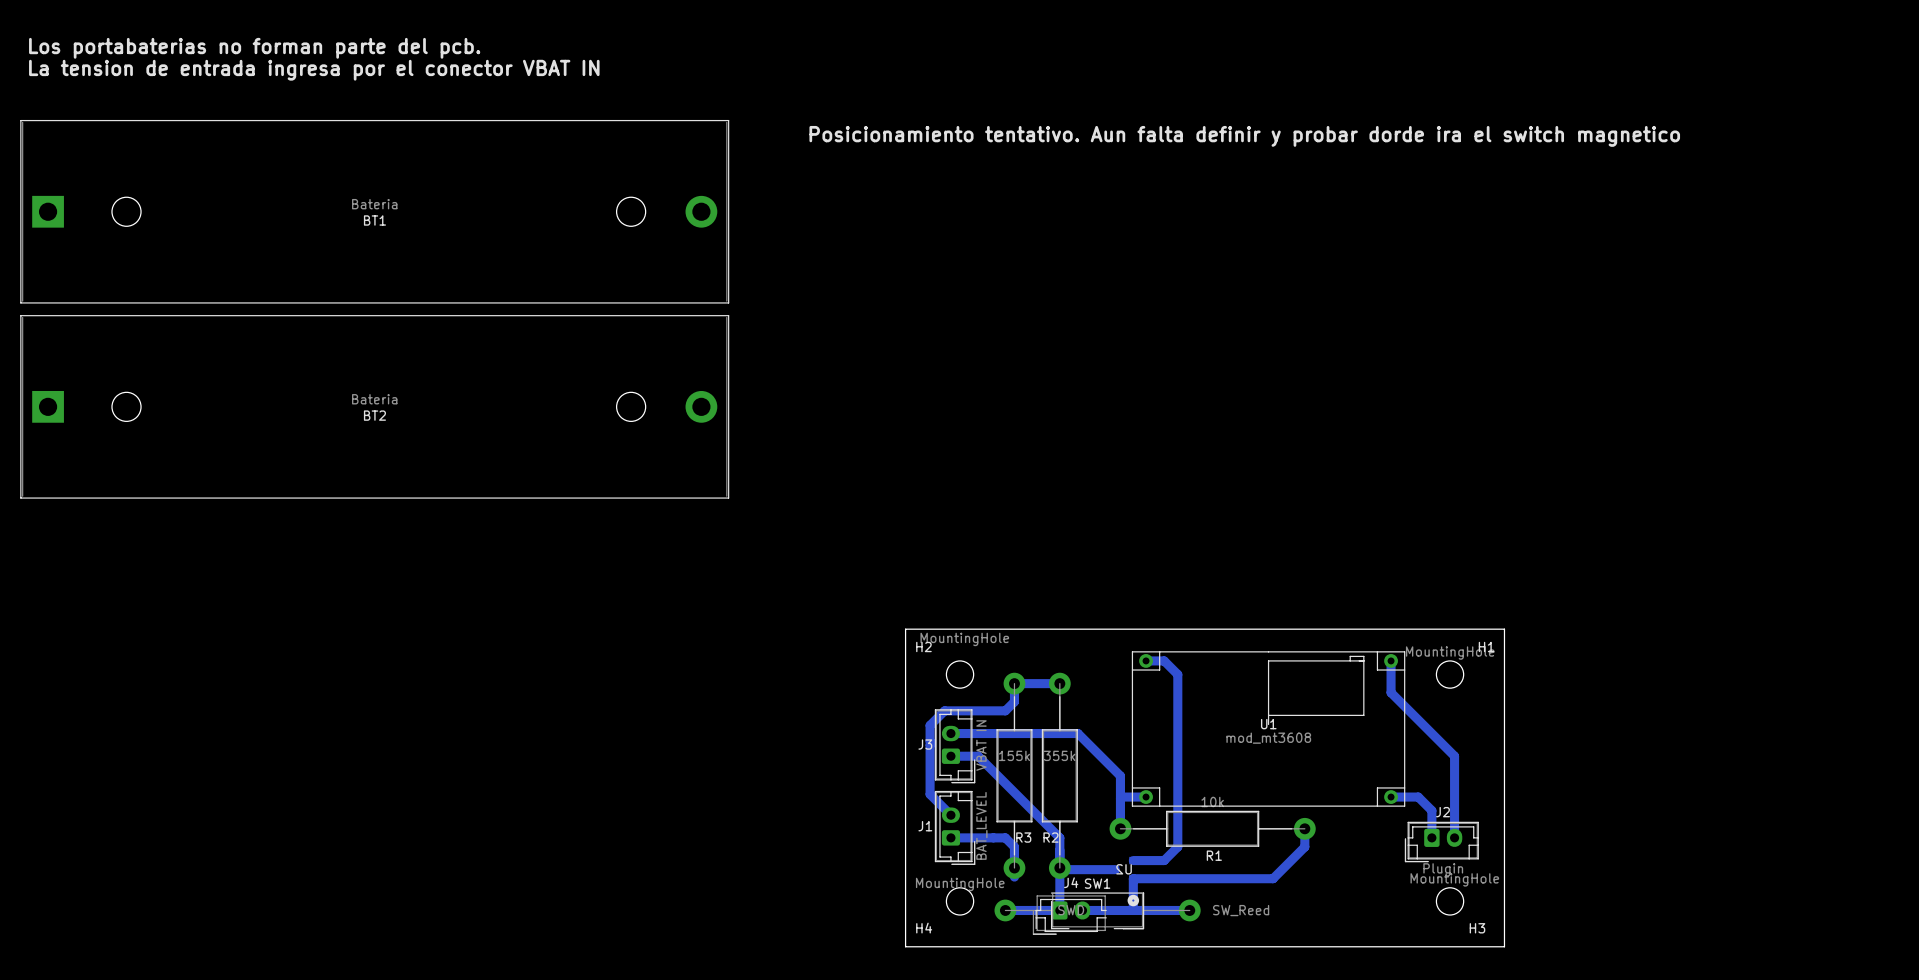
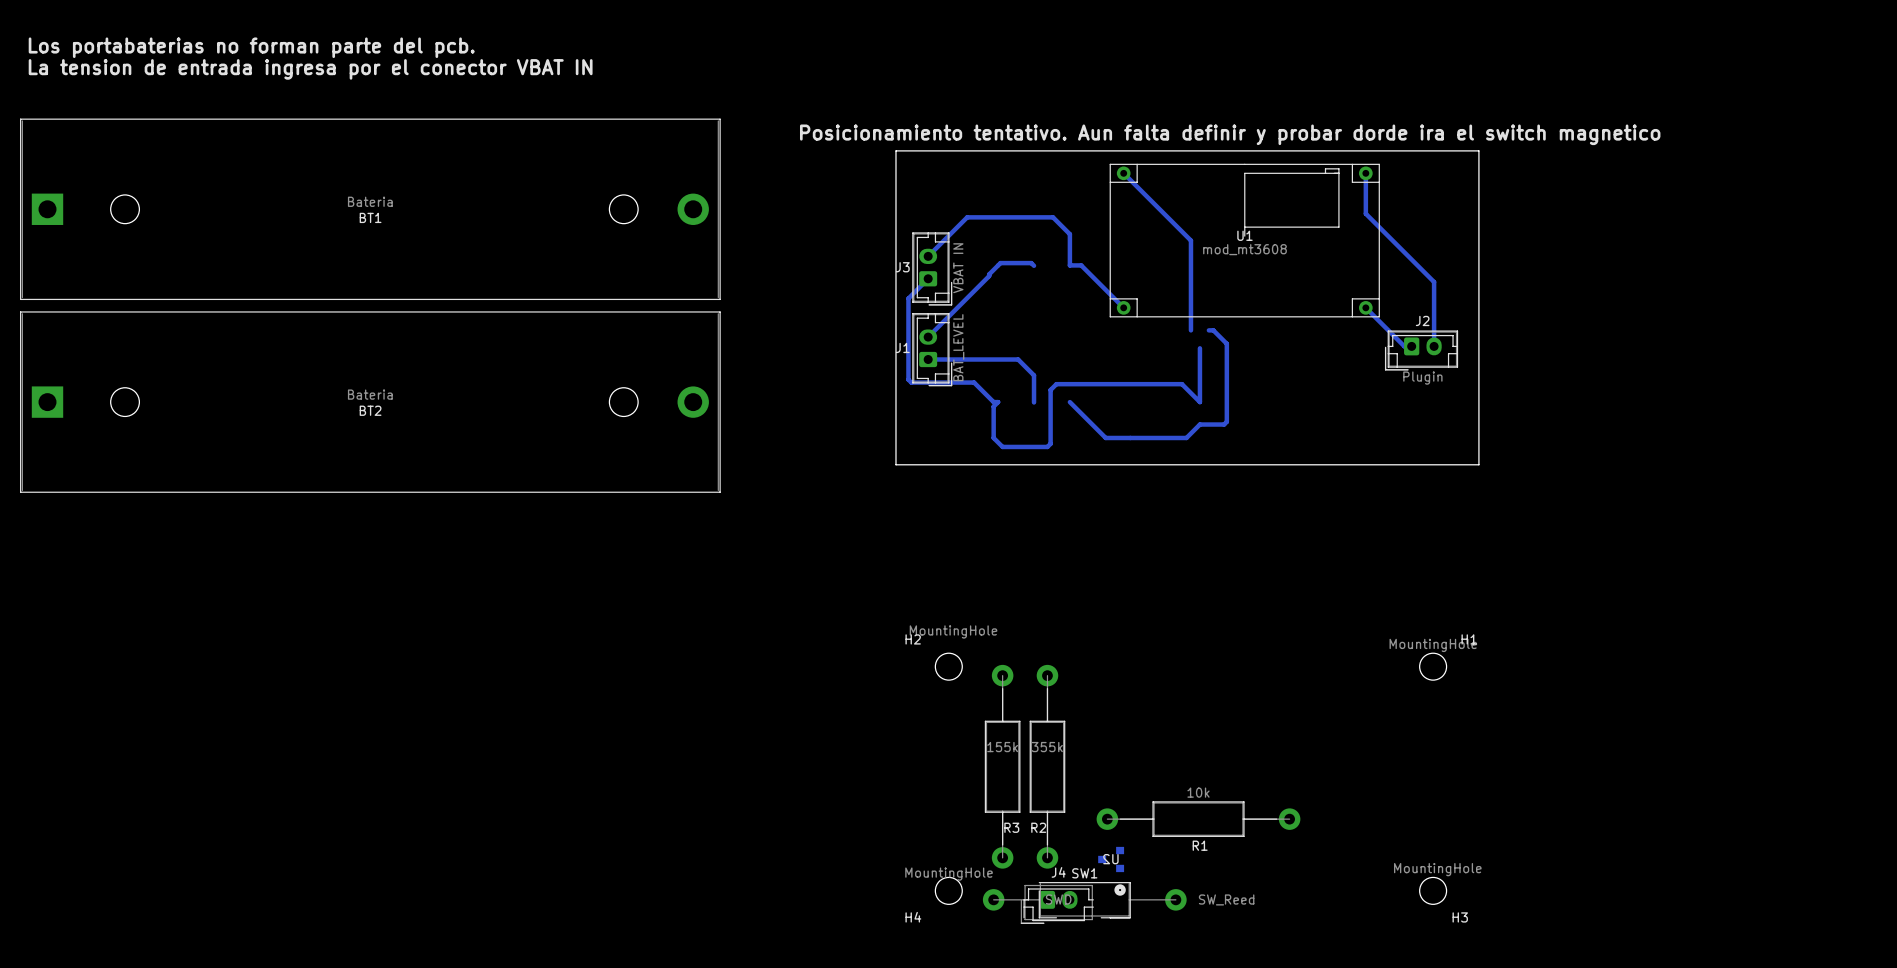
board edge: none -> (895, 150) (1478, 150) (1478, 464) (895, 464) (895, 150)
bottom track: none -> (1123, 173) (1190, 240) (1190, 330)
bottom track: none -> (1365, 173) (1365, 213) (1434, 282) (1434, 346)
bottom track: none -> (928, 256) (967, 217) (1053, 217) (1069, 234) (1069, 265) (1081, 265) (1123, 307)
bottom track: none -> (1034, 265) (1031, 263) (1000, 263) (928, 337)
bottom track: none -> (928, 278) (908, 298) (908, 379) (911, 382) (974, 382) (993, 402) (998, 402) (993, 406) (993, 437) (1002, 446) (1047, 446) (1050, 443) (1050, 390) (1056, 384) (1181, 384) (1199, 402) (1199, 348)
bottom track: none -> (1365, 307) (1404, 346) (1411, 346)
bottom track: none -> (1208, 330) (1213, 330) (1226, 343) (1226, 421) (1224, 424) (1199, 424) (1186, 437) (1105, 437) (1069, 402)
bottom track: none -> (928, 359) (1018, 359) (1034, 375) (1034, 402)
board edge: (905, 629) (1504, 629) (1504, 946) (905, 946) (905, 629) -> none
bottom track: (1146, 660) (1164, 660) (1177, 674) (1177, 846) (1164, 860) (1133, 860) -> none
bottom track: (1391, 660) (1391, 692) (1454, 756) (1454, 837) -> none
bottom track: (1059, 683) (1014, 683) (1014, 701) (1005, 710) (944, 710) (930, 725) (930, 741) (931, 743) (930, 744) (930, 794) (950, 815) -> none
U1 position: (1268, 728) -> (1244, 240)
bottom track: (950, 733) (1077, 733) (1120, 776) (1120, 828) -> none
J3 position: (955, 746) -> (932, 268)
bottom track: (950, 756) (978, 756) (1059, 837) (1059, 910) (1005, 910) -> none
bottom track: (1146, 797) (1122, 797) (1120, 798) -> none
bottom track: (1391, 797) (1418, 797) (1431, 810) (1431, 837) -> none
J1 position: (955, 827) -> (932, 349)
bottom track: (1304, 828) (1304, 846) (1273, 878) (1133, 878) (1132, 910) -> none
bottom track: (950, 837) (1005, 837) (1014, 846) (1014, 877) -> none
J2 position: (1441, 841) -> (1421, 350)
bottom track: (1066, 869) (1115, 869) -> none
bottom track: (1082, 910) (1189, 910) -> none

